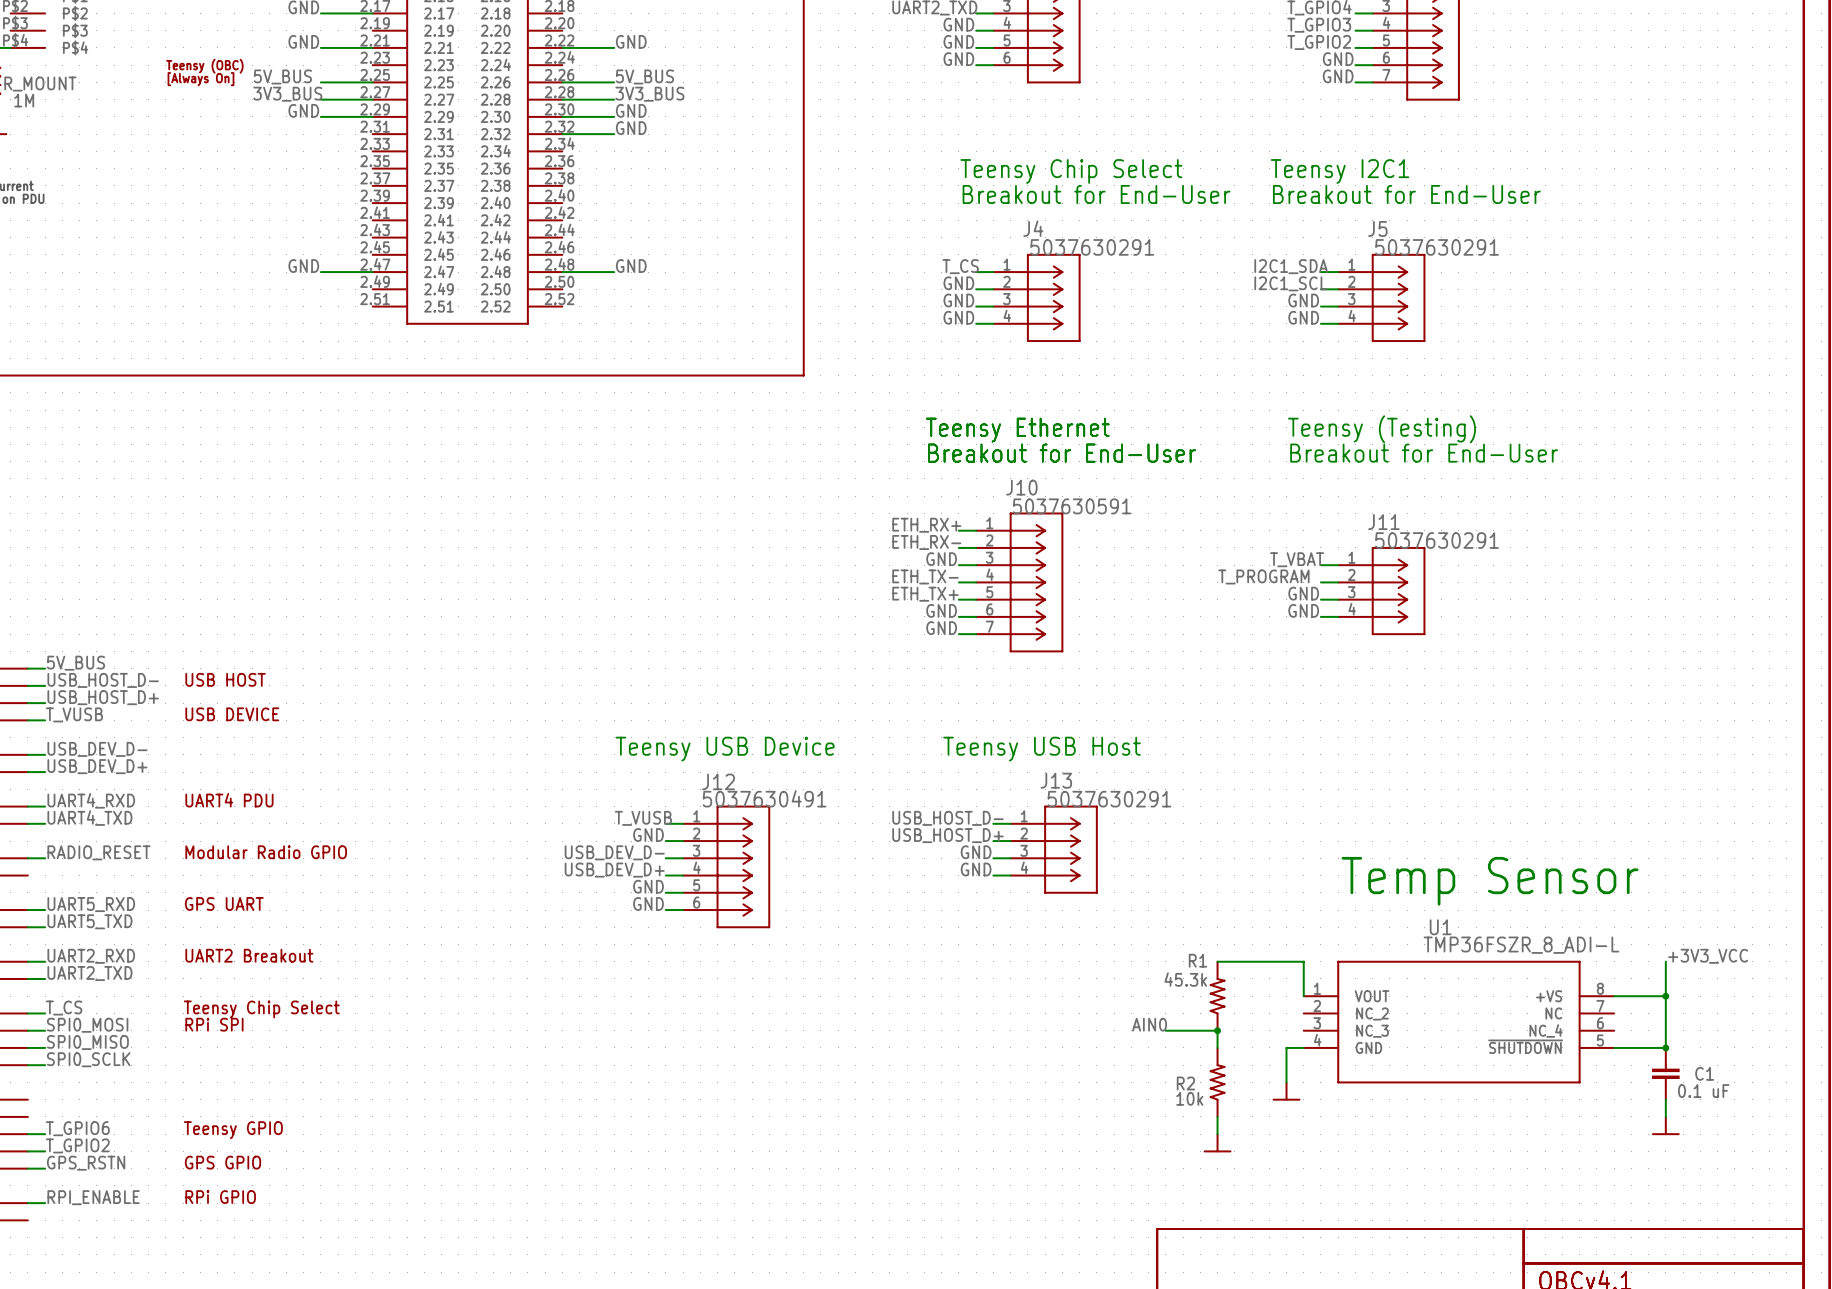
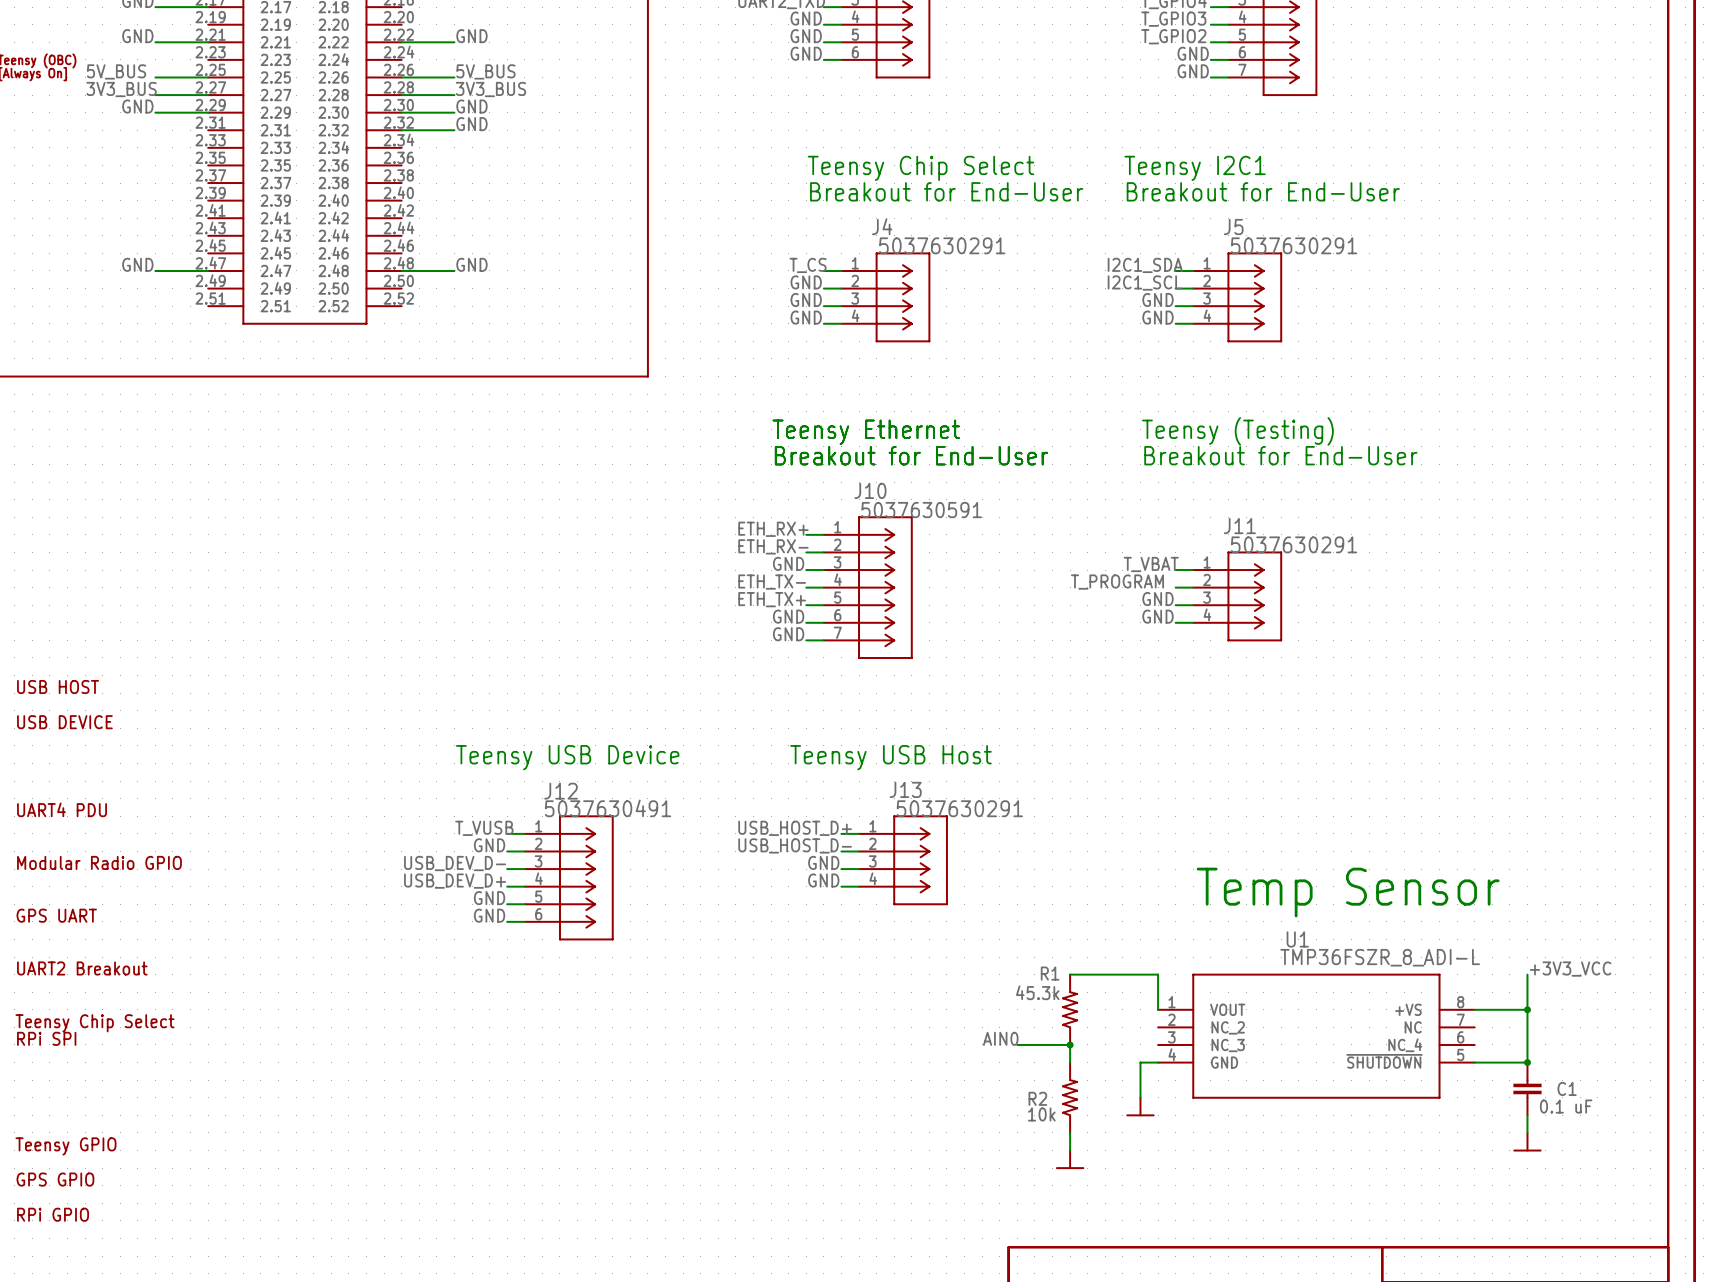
label: USB_HOST_D- (948, 818) -> USB_HOST_D+ (795, 828)
label: USB_HOST_D+ (948, 835) -> USB_HOST_D- (795, 845)

